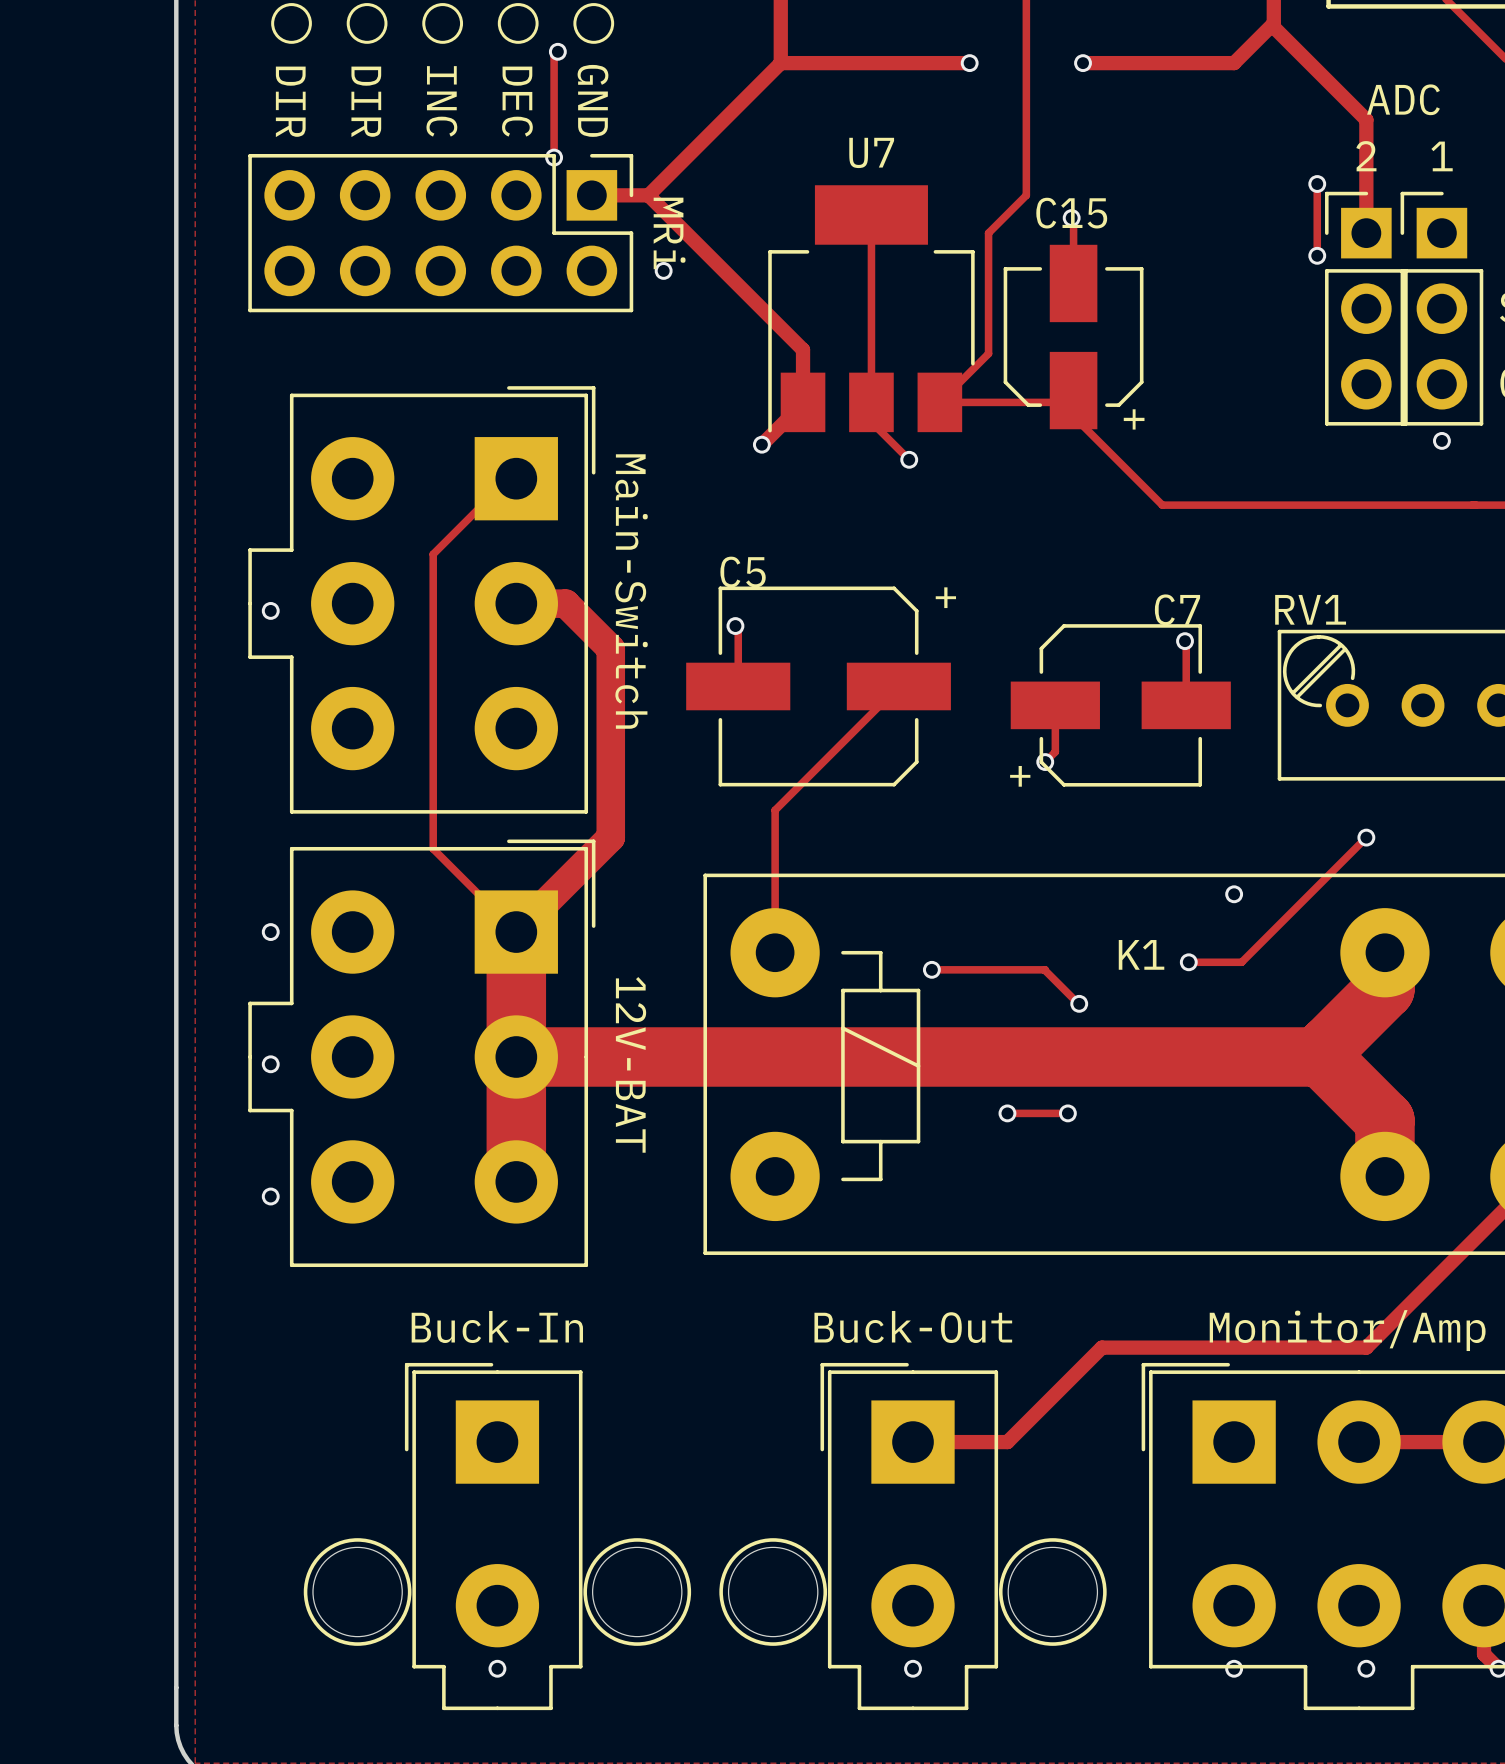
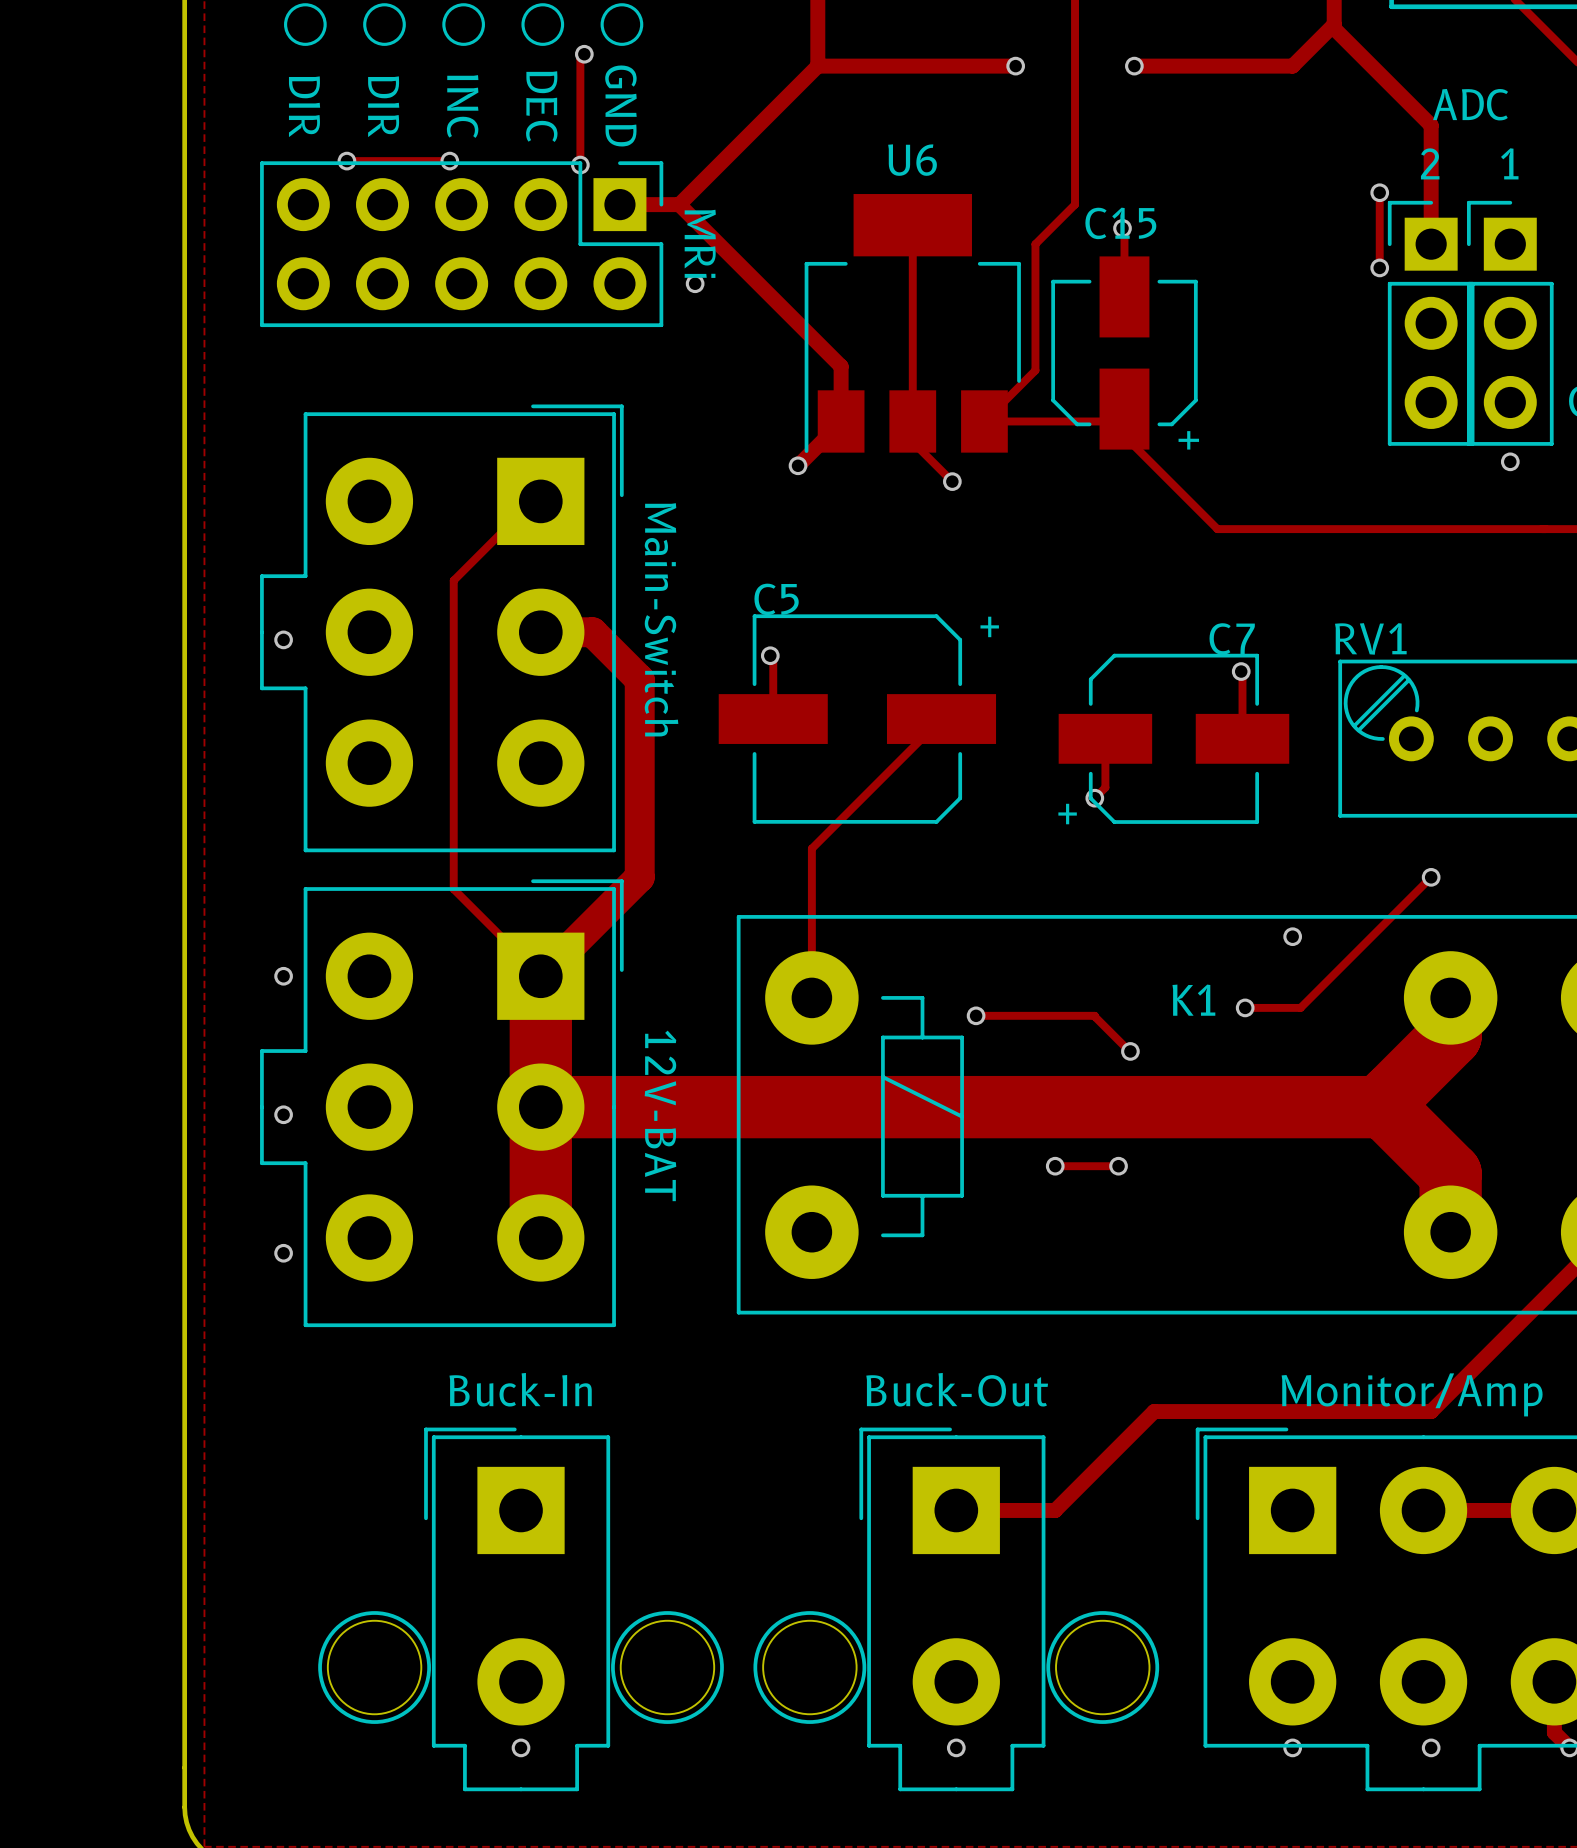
U7 name: U7 (871, 152) -> U6 (912, 160)
track: none -> (346, 161) (449, 161)
via: none -> (346, 161)
via: none -> (449, 161)

